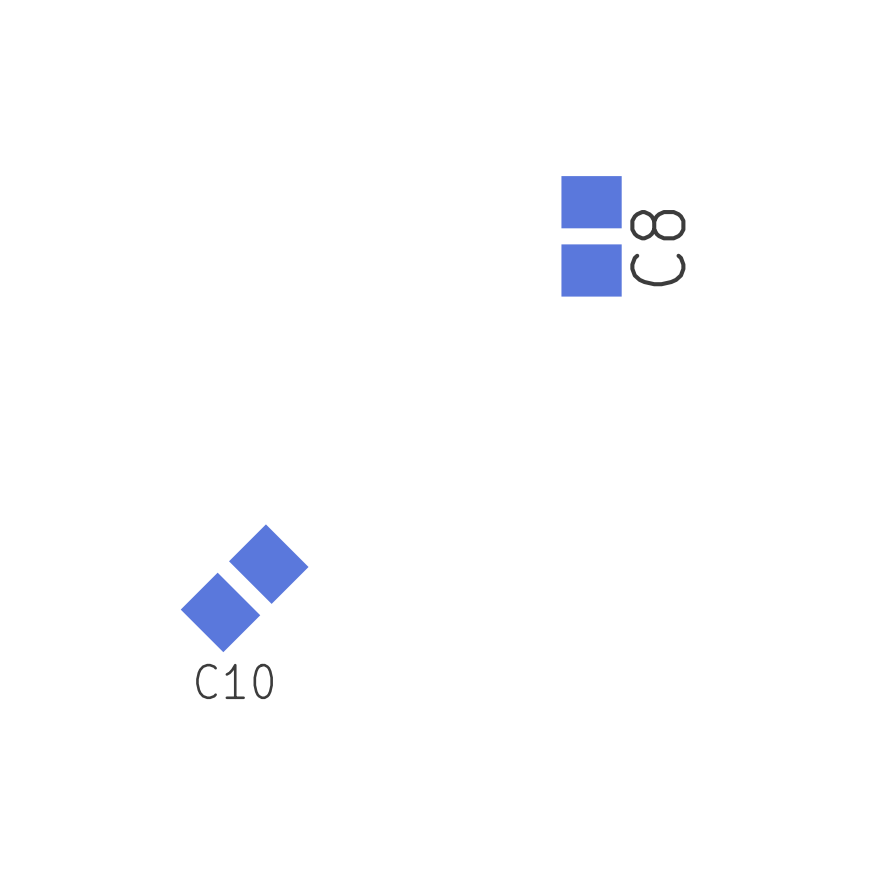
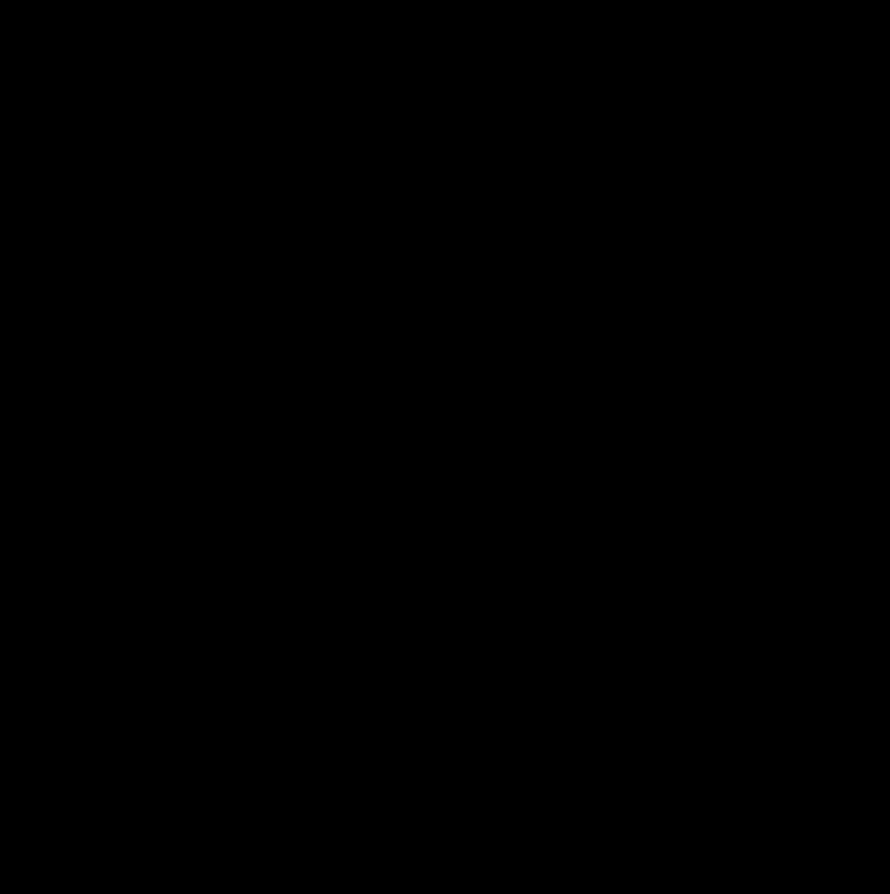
C8: (591, 236) -> none
C10: (244, 588) -> none

